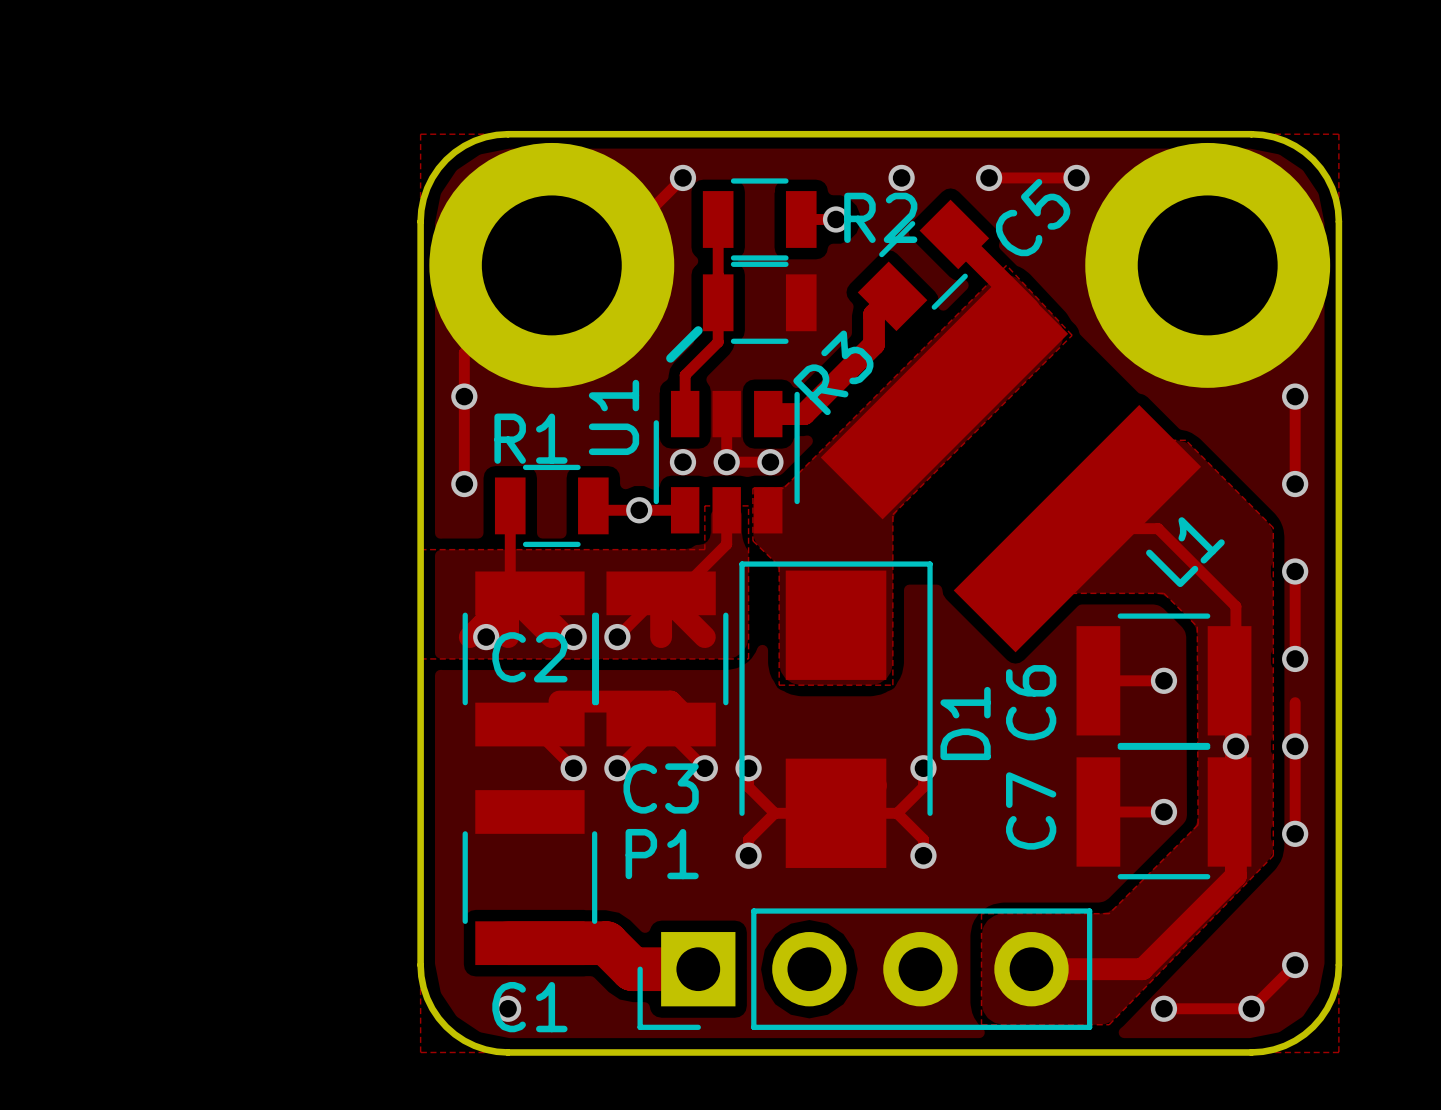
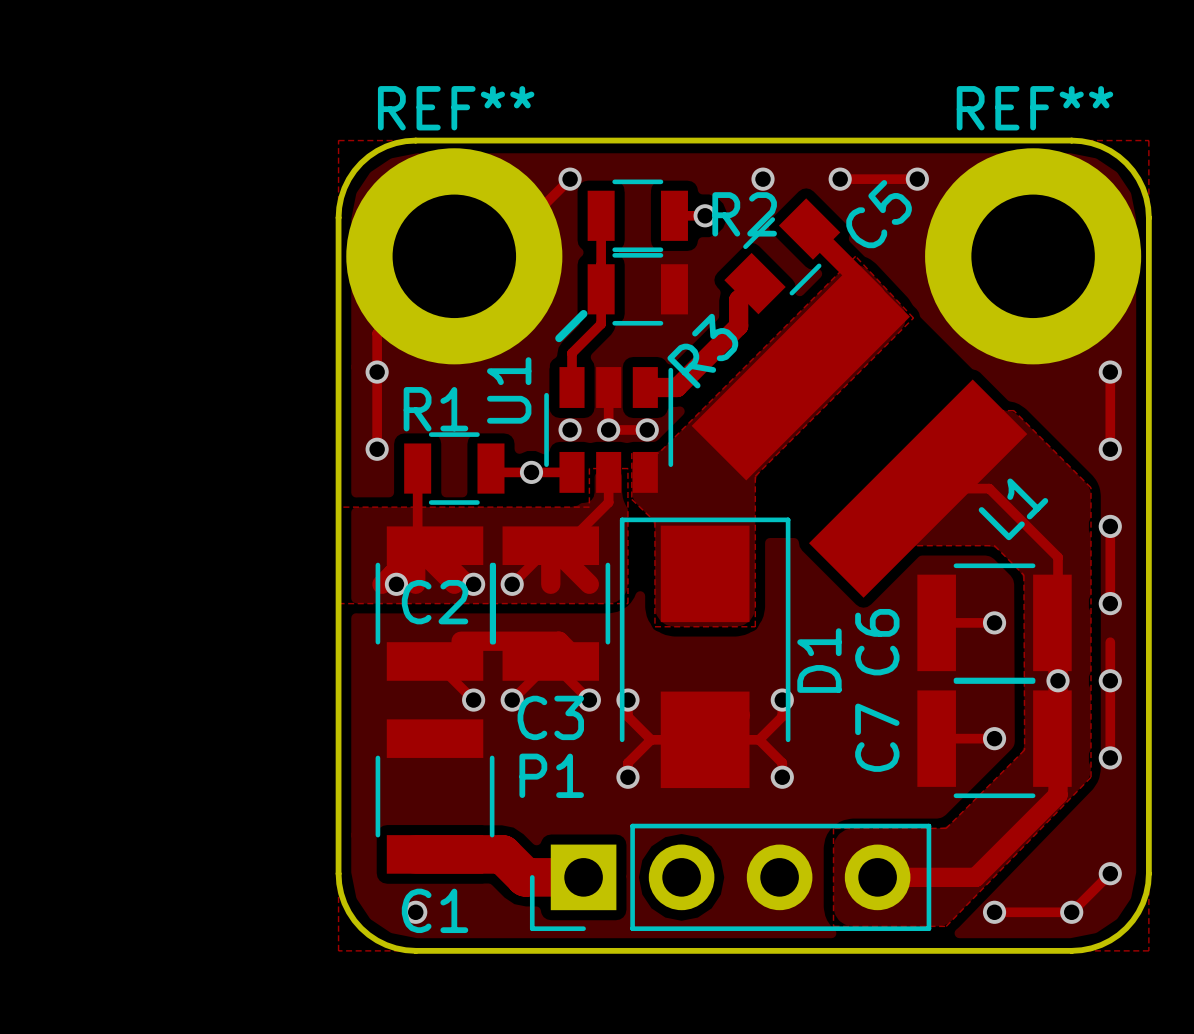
REF** name: none -> REF** (456, 108)
REF** name: none -> REF** (1034, 108)

